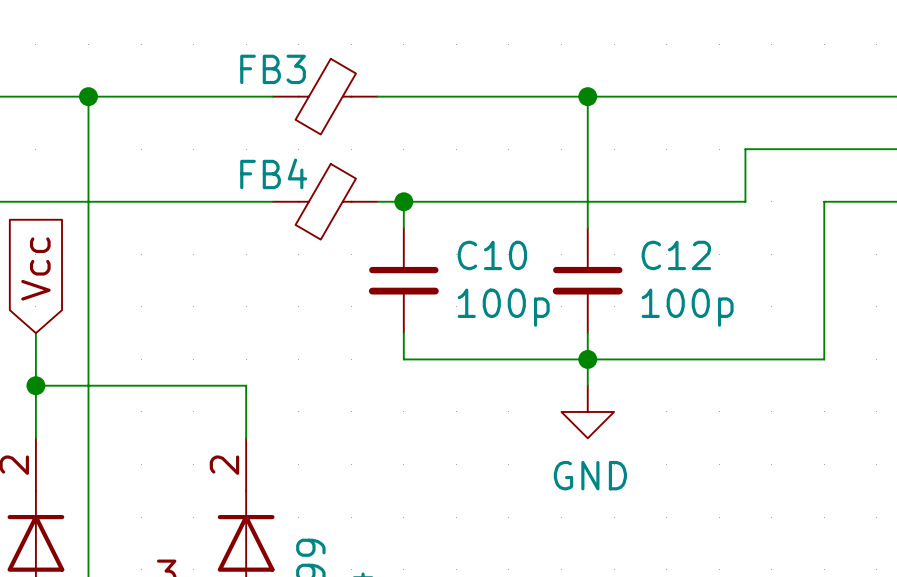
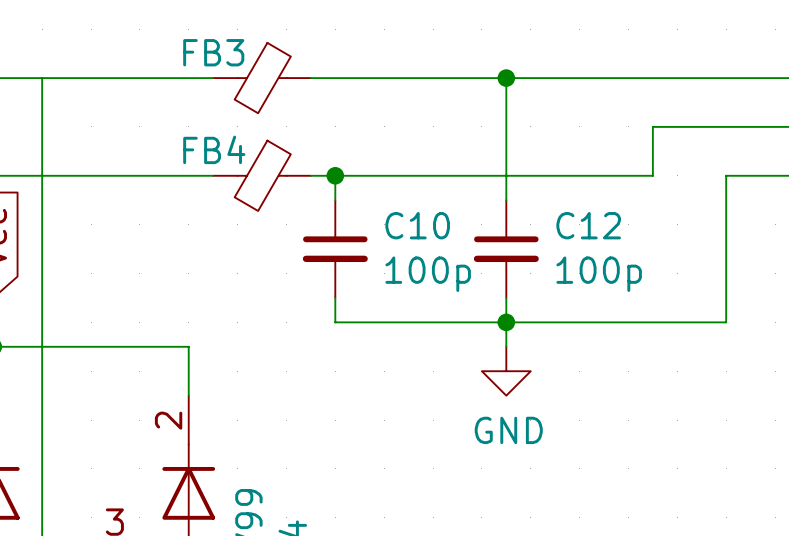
junction: (88, 96) -> none

